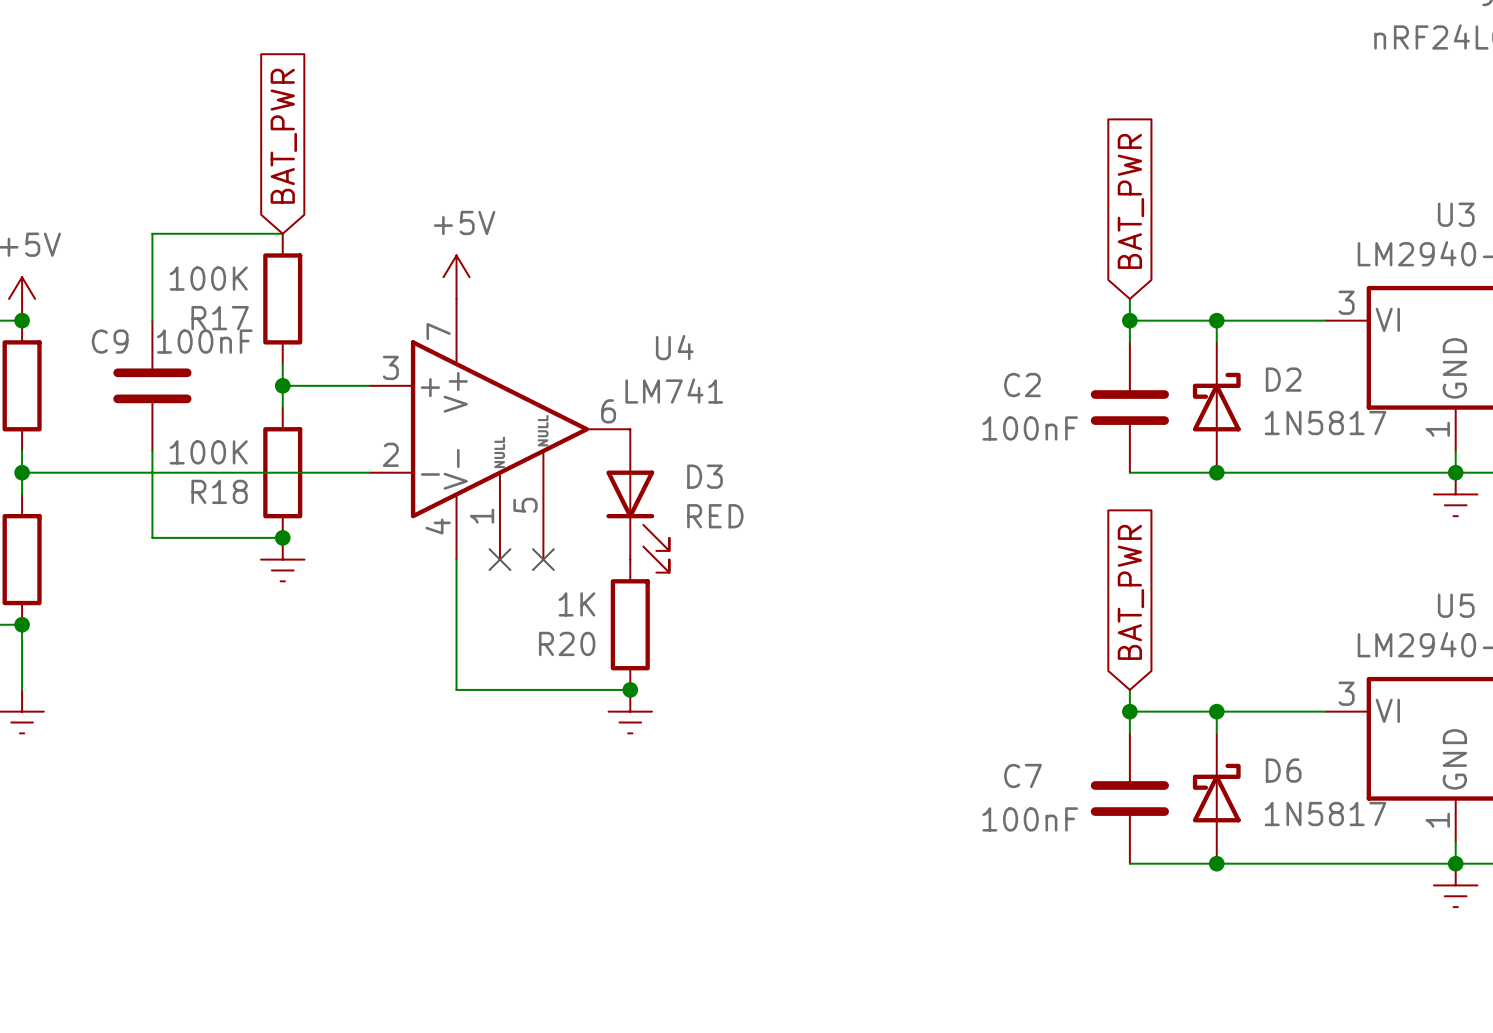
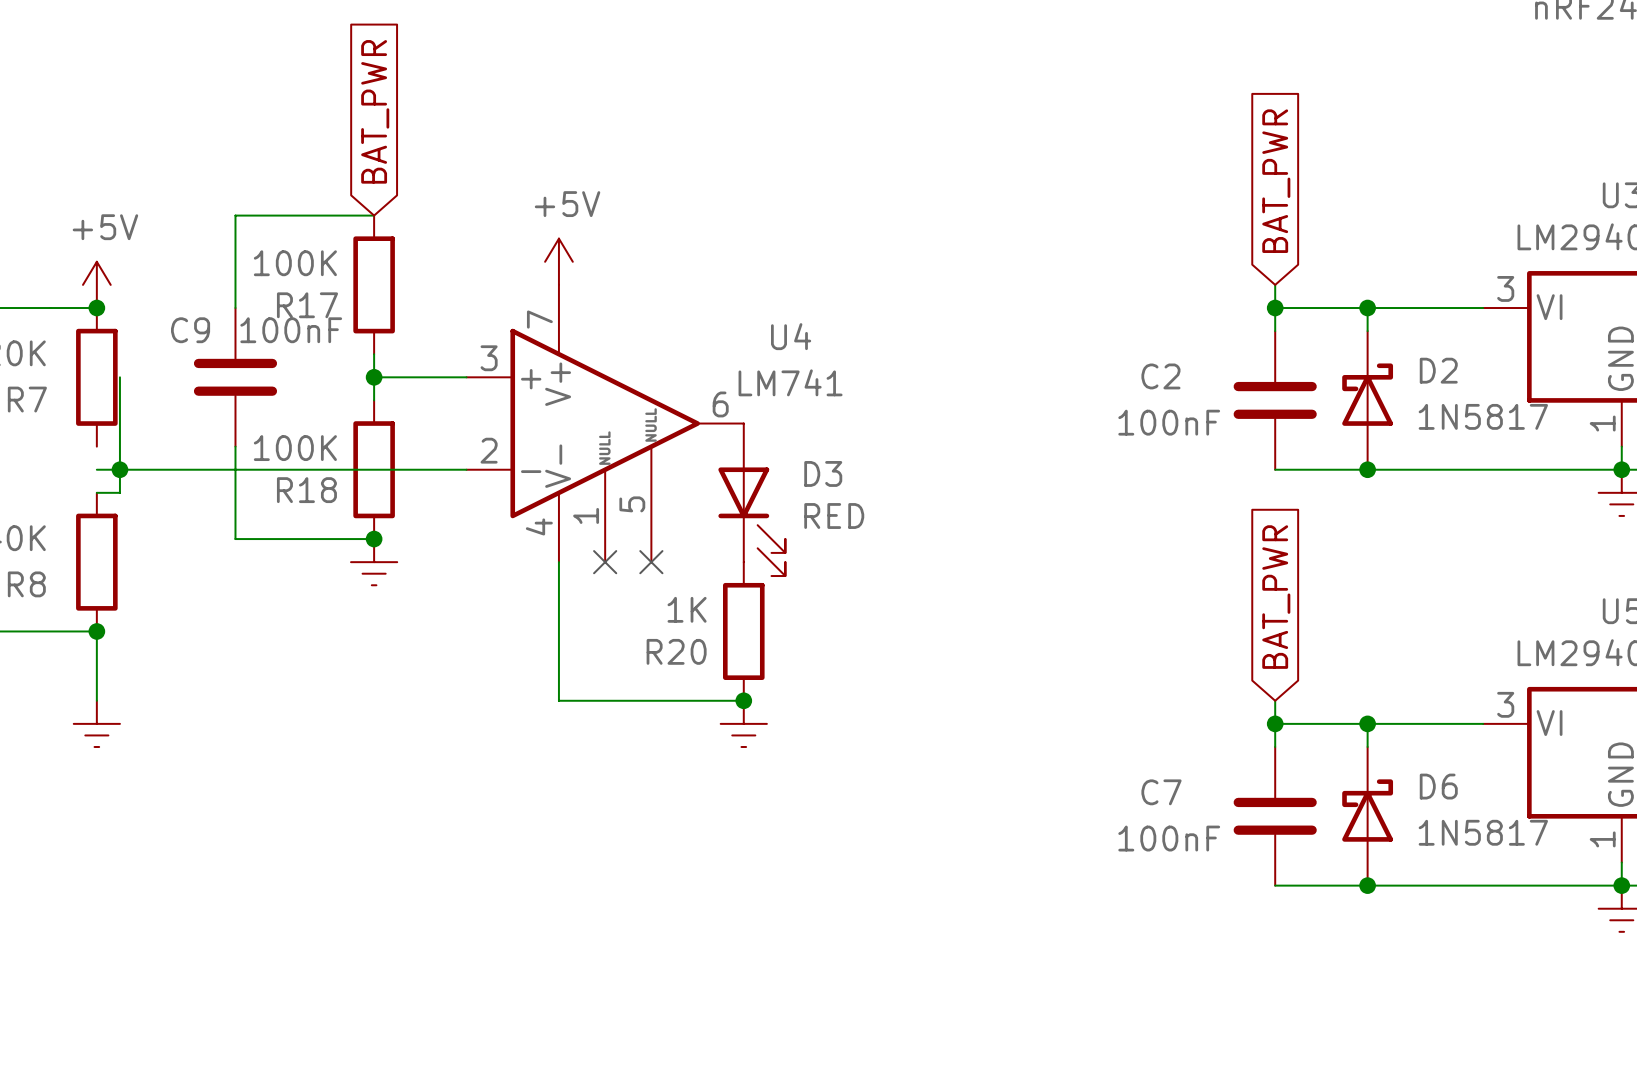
wire: (22, 450) (22, 494) -> (119, 377) (119, 492) (96, 492)
junction position: (22, 472) -> (119, 469)

